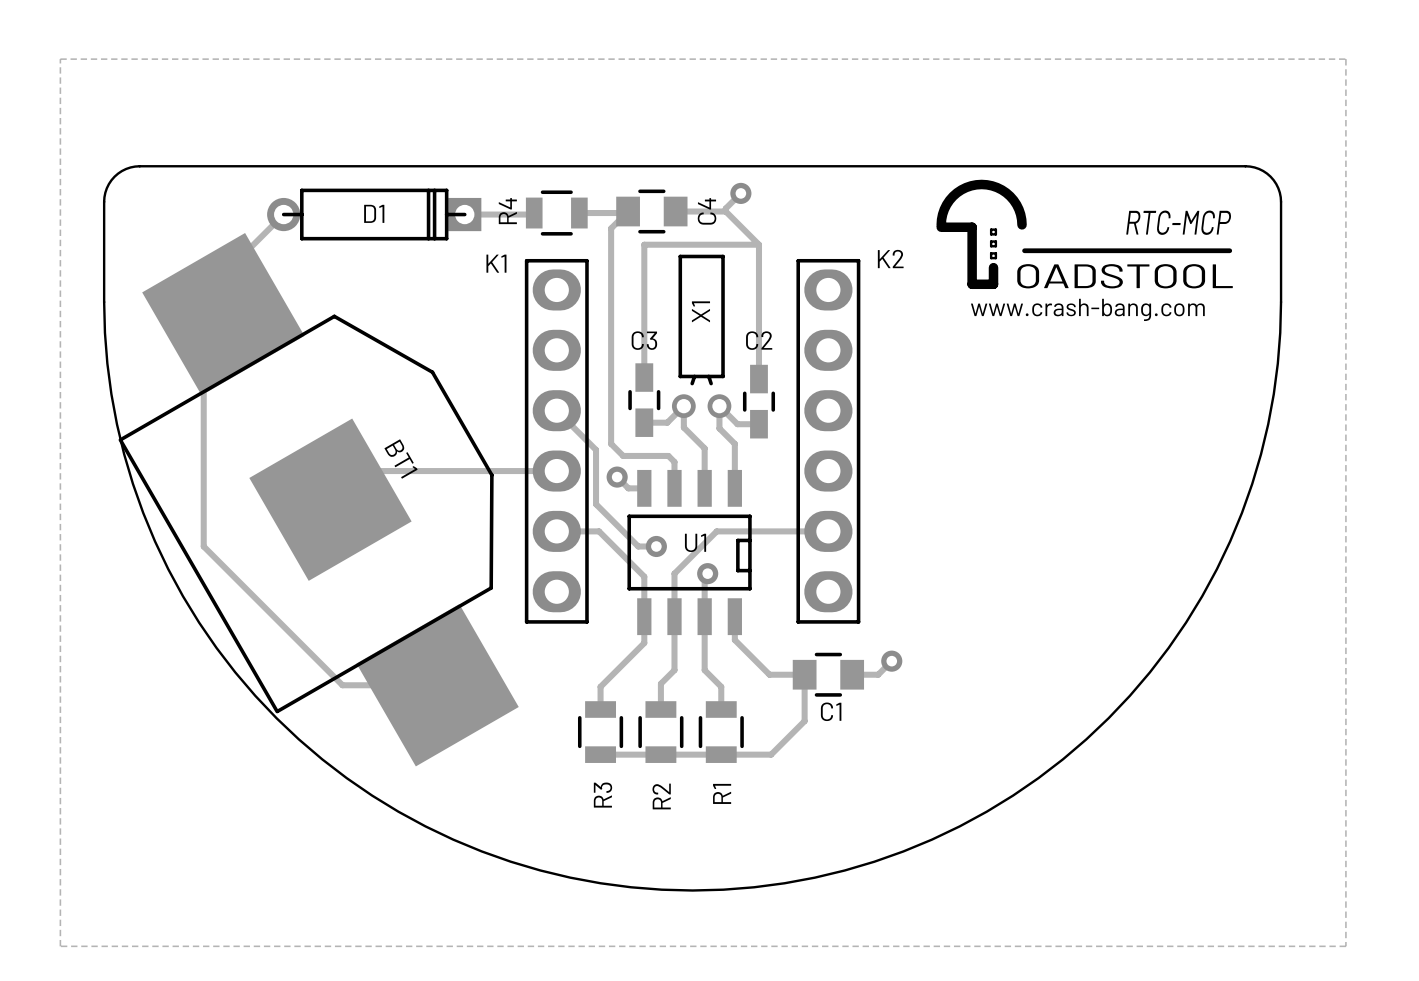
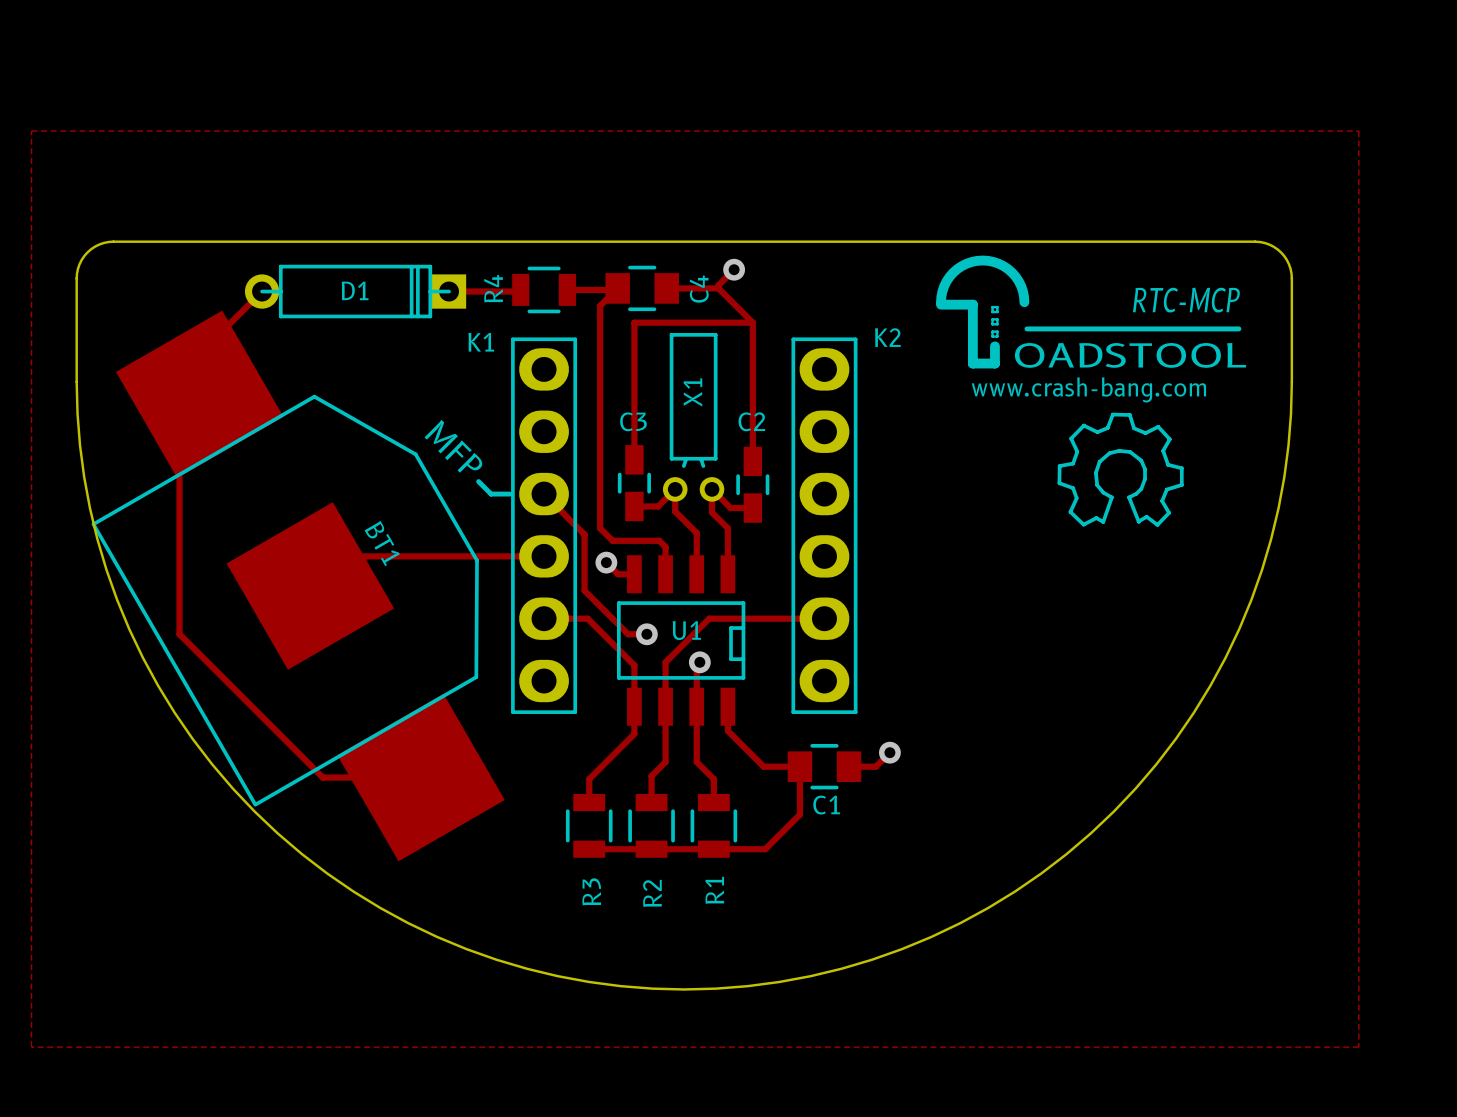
drawing: none -> [1057, 412, 1184, 527]
text: none -> MFP (453, 446)
line: none -> (478, 481) (491, 494) (509, 494)

